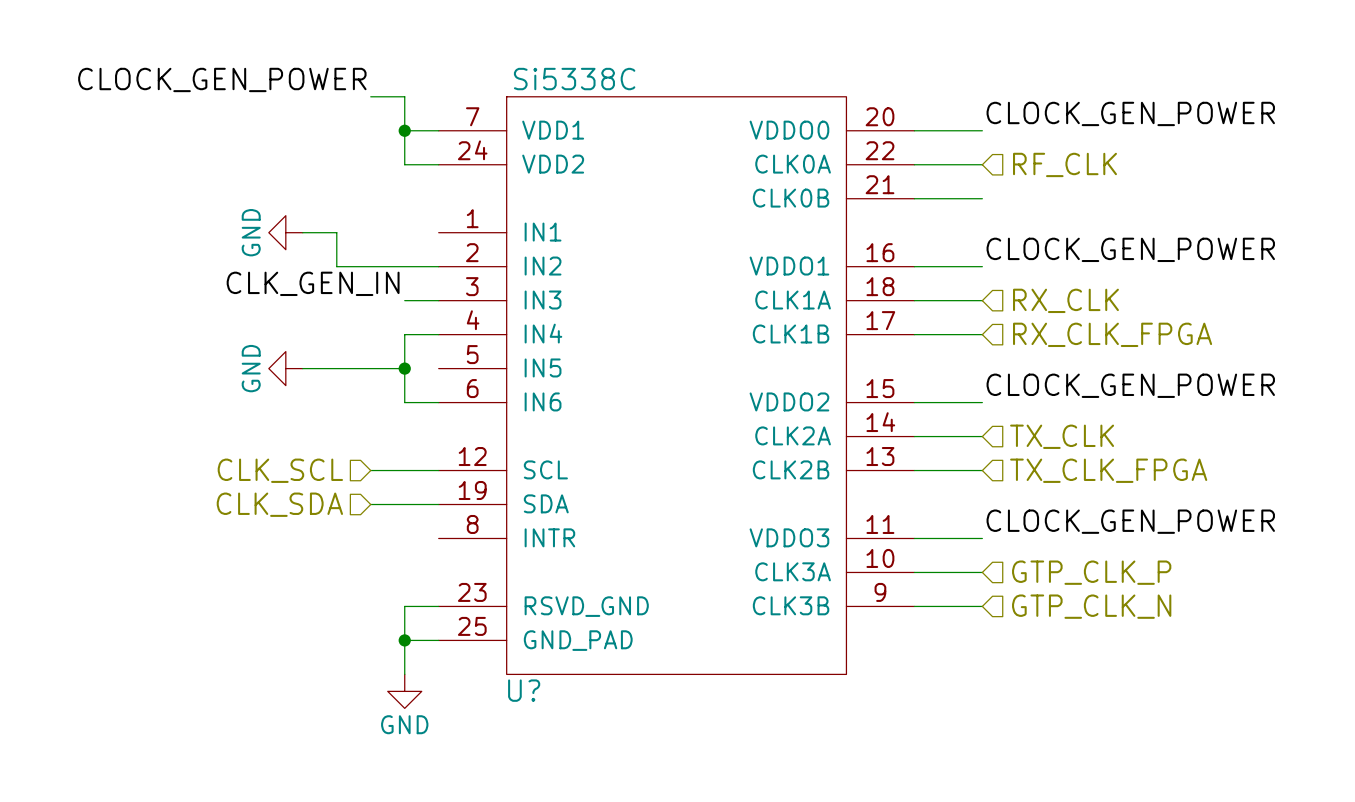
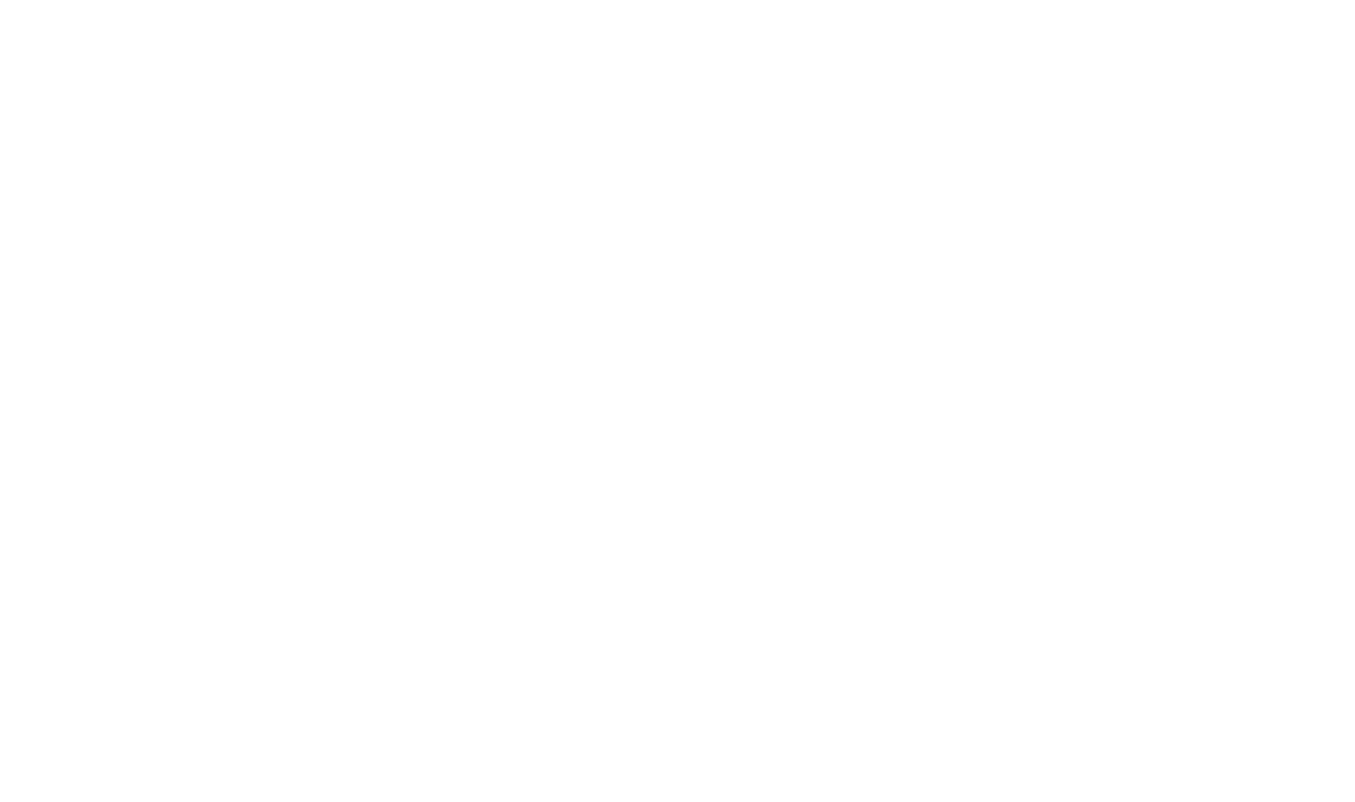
label: CLOCK_GEN_POWER (222, 79) -> none
wire: (370, 96) (404, 96) (404, 164) (438, 164) -> none
label: CLOCK_GEN_POWER (1130, 113) -> none
wire: (404, 130) (438, 130) -> none
junction: (404, 130) -> none
wire: (914, 130) (982, 130) -> none
wire: (914, 164) (982, 164) -> none
hierarchical label: RF_CLK (1064, 164) -> none
wire: (914, 198) (982, 198) -> none
power symbol: GND (285, 232) -> none
wire: (302, 232) (336, 232) (336, 266) (438, 266) -> none
label: CLOCK_GEN_POWER (1130, 249) -> none
wire: (914, 266) (982, 266) -> none
label: CLK_GEN_IN (313, 283) -> none
wire: (404, 300) (438, 300) -> none
wire: (914, 300) (982, 300) -> none
hierarchical label: RX_CLK (1065, 300) -> none
wire: (438, 334) (404, 334) (404, 402) (438, 402) -> none
wire: (914, 334) (982, 334) -> none
hierarchical label: RX_CLK_FPGA (1112, 334) -> none
power symbol: GND (285, 368) -> none
wire: (302, 368) (404, 368) -> none
junction: (404, 368) -> none
U?: Si5338C (676, 385) -> none
label: CLOCK_GEN_POWER (1130, 385) -> none
wire: (914, 402) (982, 402) -> none
wire: (914, 436) (982, 436) -> none
hierarchical label: TX_CLK (1062, 436) -> none
hierarchical label: CLK_SCL (280, 470) -> none
wire: (370, 470) (438, 470) -> none
wire: (914, 470) (982, 470) -> none
hierarchical label: TX_CLK_FPGA (1108, 470) -> none
hierarchical label: CLK_SDA (279, 504) -> none
wire: (370, 504) (438, 504) -> none
label: CLOCK_GEN_POWER (1130, 521) -> none
wire: (914, 538) (982, 538) -> none
wire: (914, 572) (982, 572) -> none
hierarchical label: GTP_CLK_P (1091, 572) -> none
wire: (438, 606) (404, 606) (404, 674) -> none
wire: (914, 606) (982, 606) -> none
hierarchical label: GTP_CLK_N (1091, 606) -> none
wire: (404, 640) (438, 640) -> none
junction: (404, 640) -> none
power symbol: GND (404, 691) -> none

